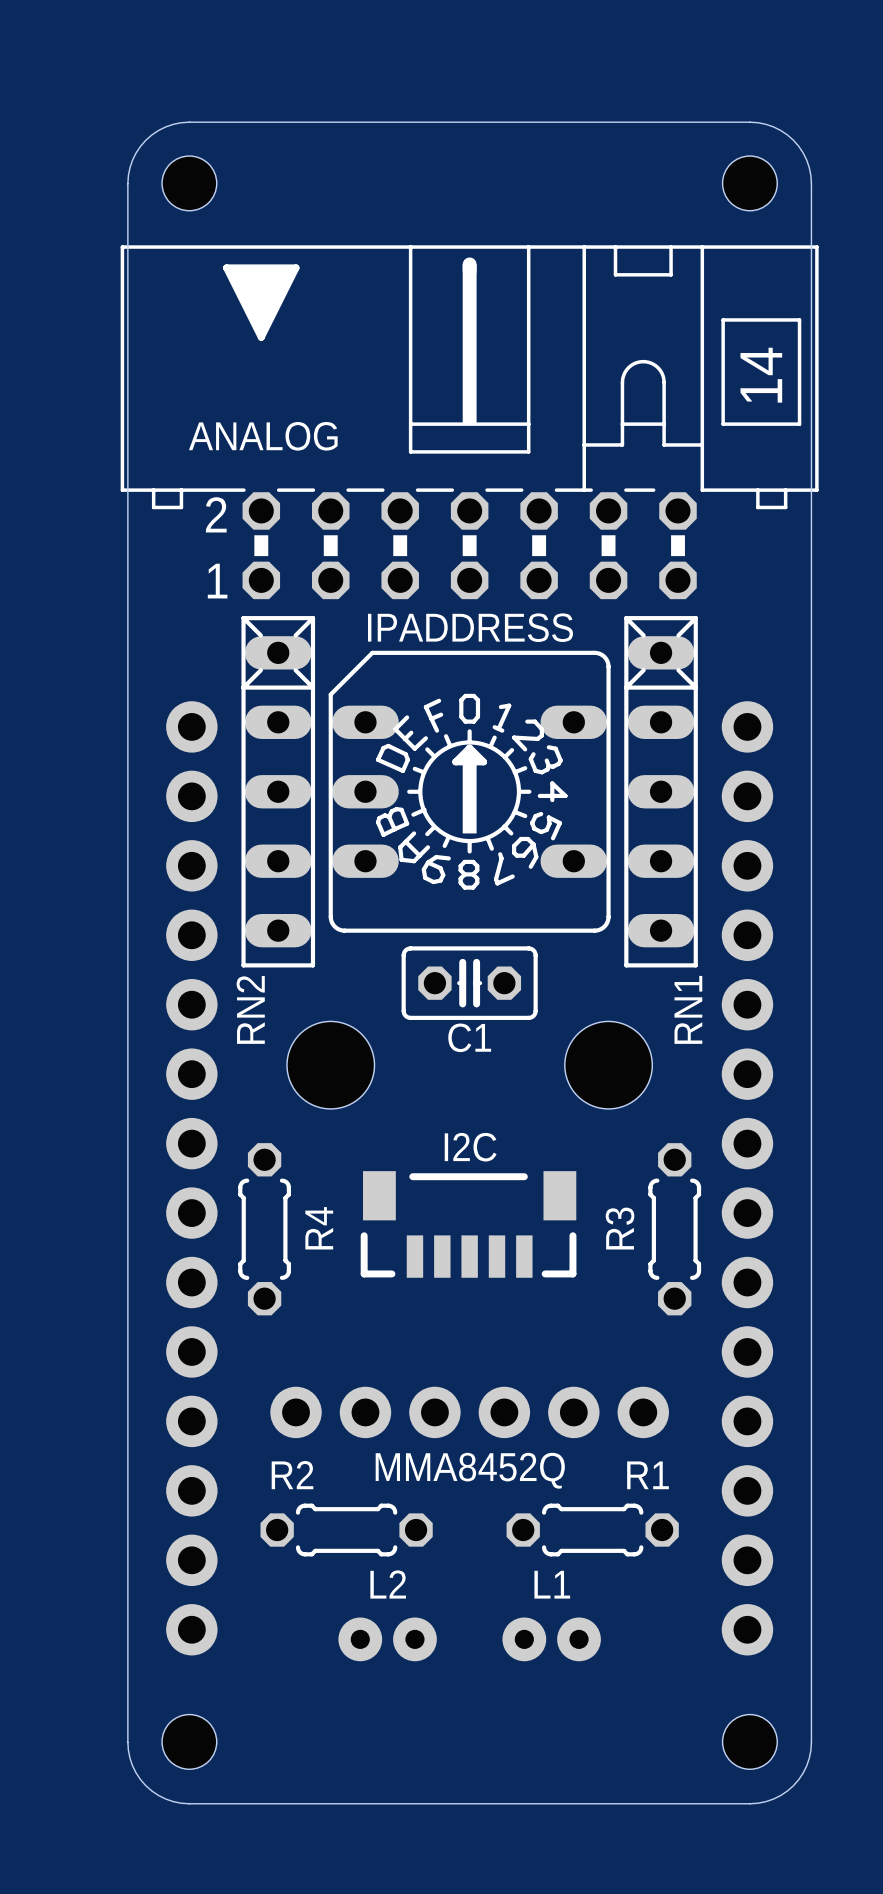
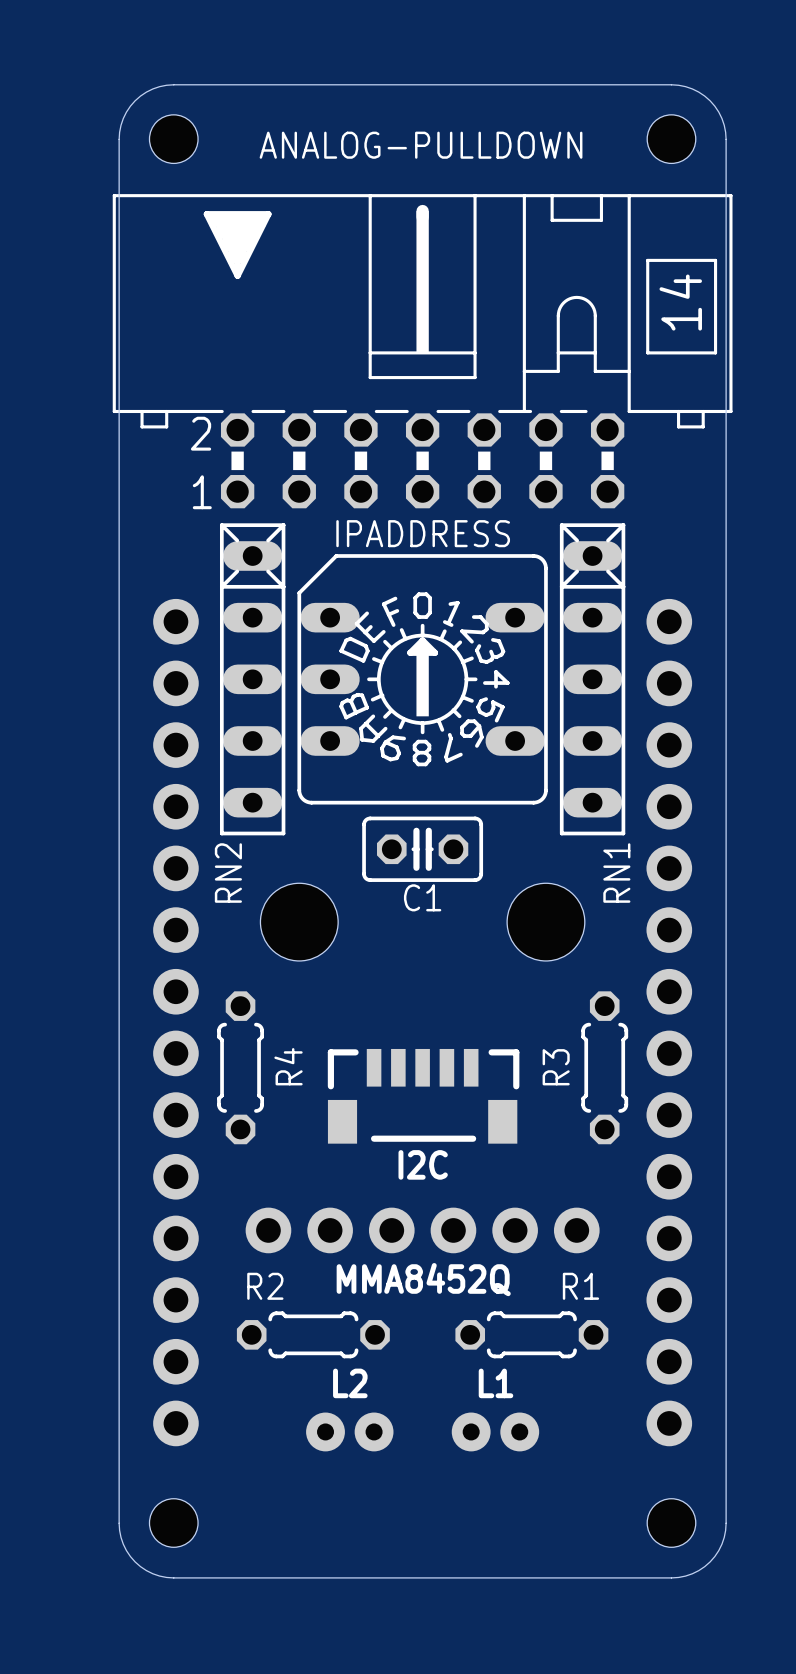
ANALOG name: ANALOG (263, 436) -> ANALOG-PULLDOWN (421, 145)
I2C rotation: 0° (470, 1234) -> 180° (421, 1087)

